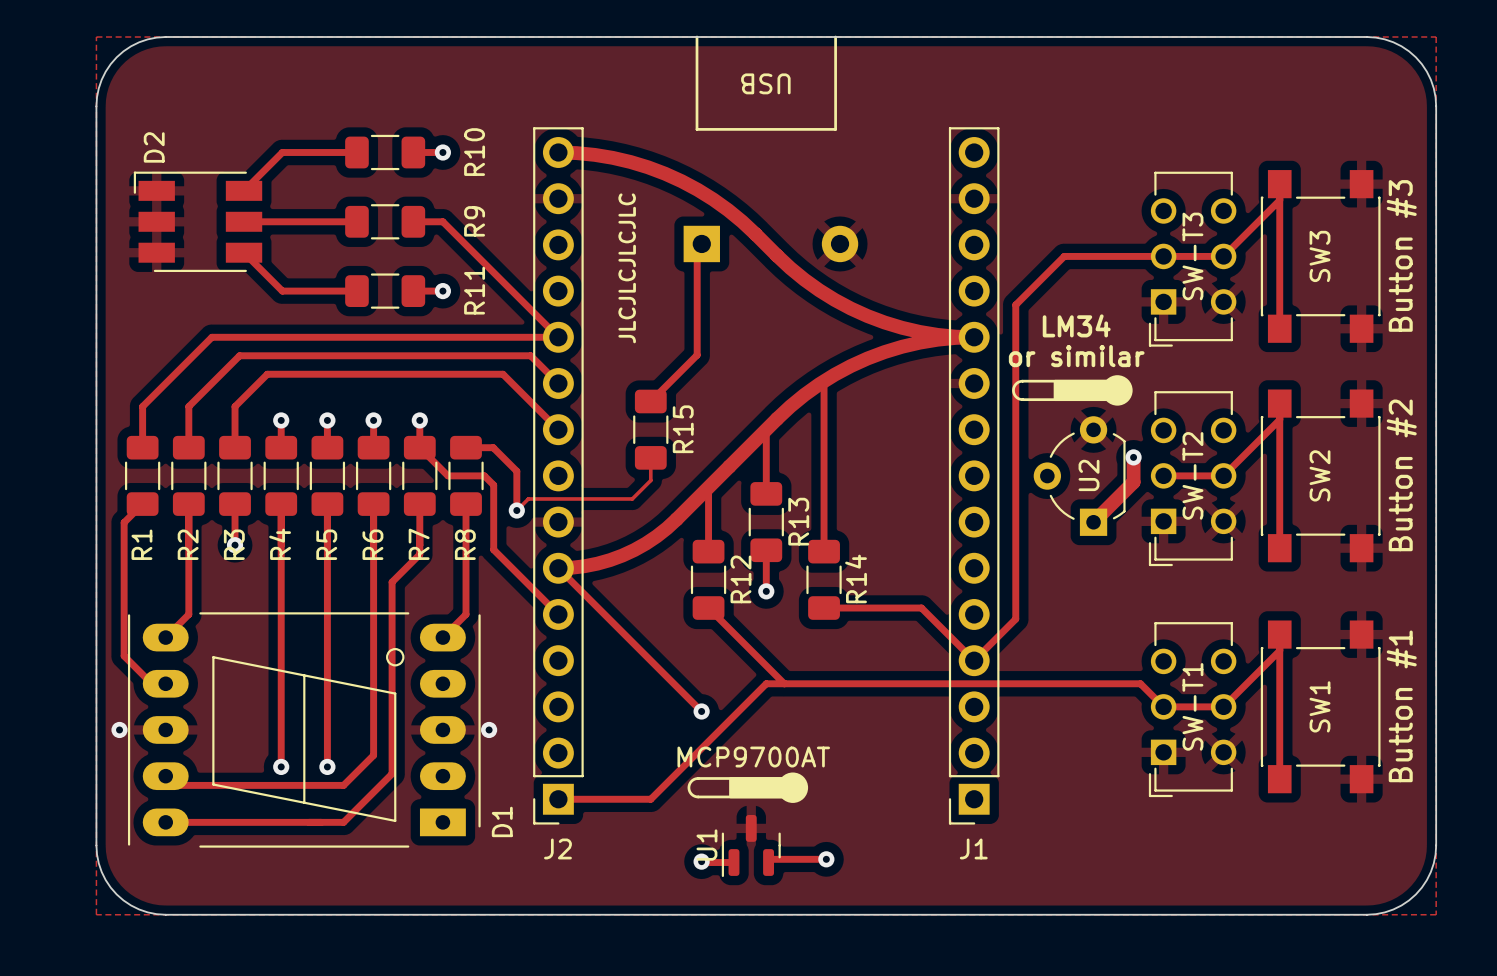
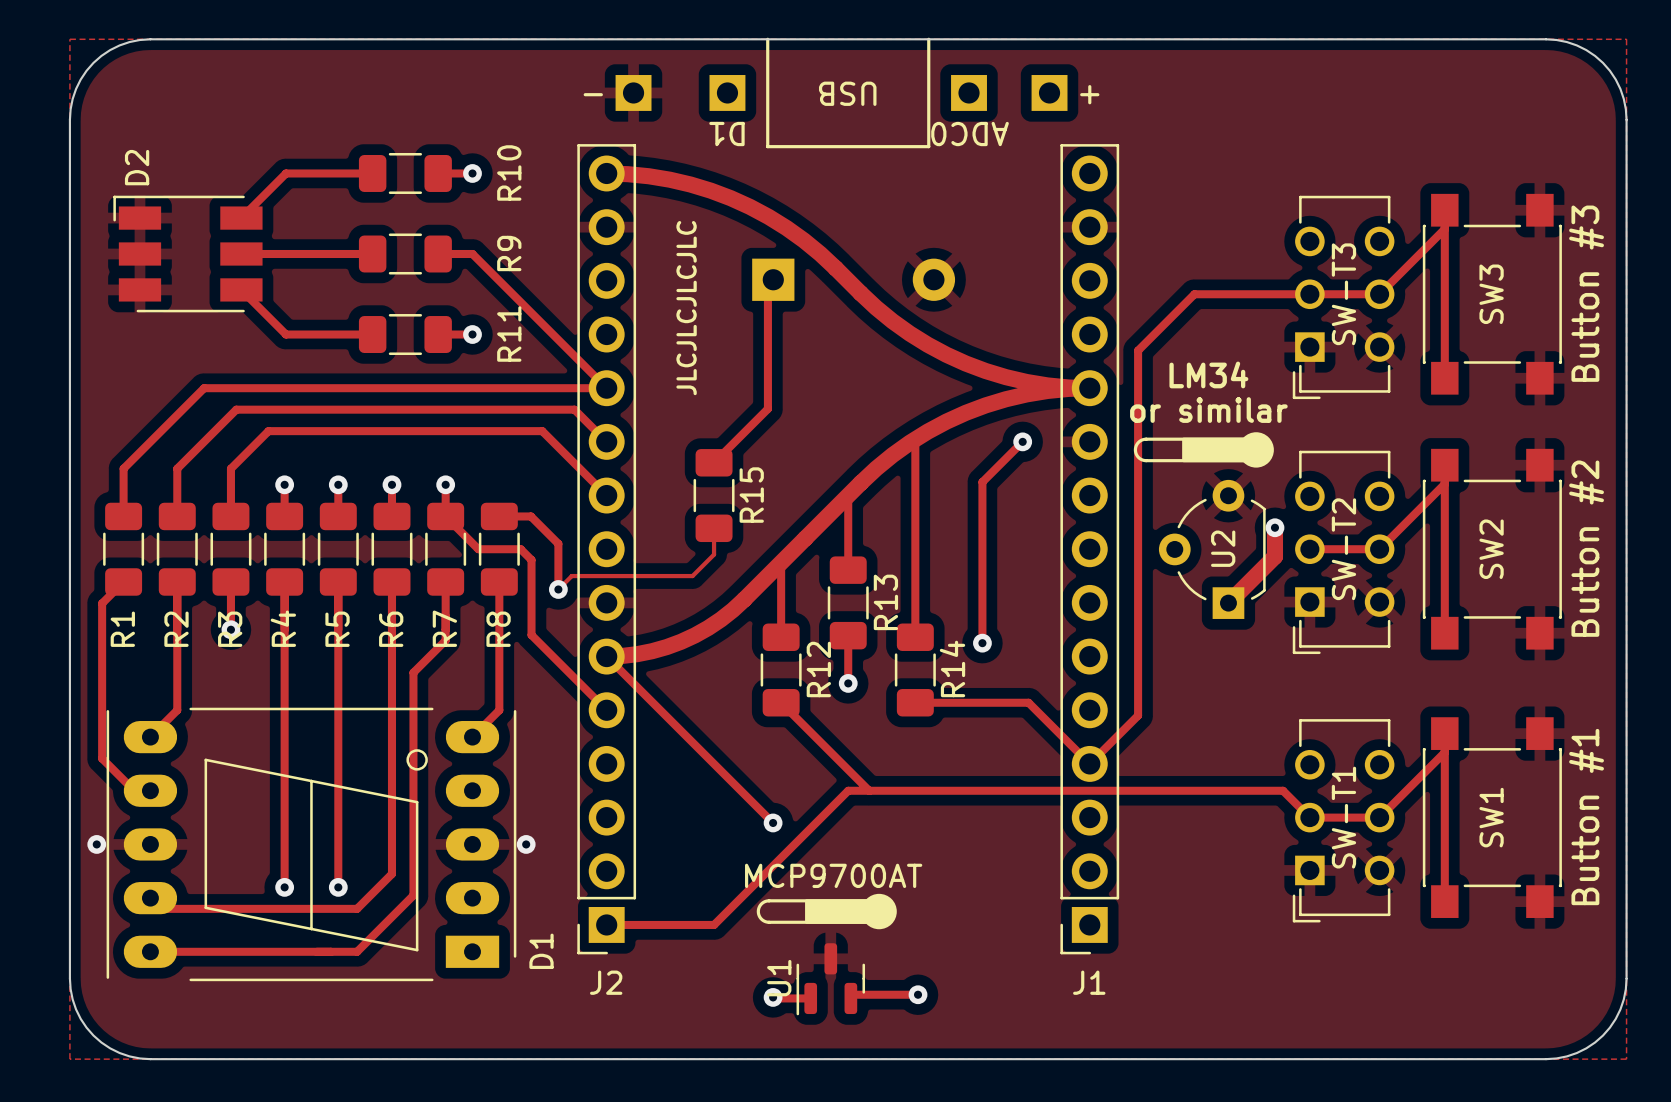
part: none -> (633, 92)
part: none -> (727, 92)
part: none -> (969, 92)
part: none -> (1049, 92)
text: none -> - (593, 94)
text: none -> + (1089, 94)
text: none -> D1 (726, 134)
text: none -> ADC0 (970, 134)
track: none -> (1022, 441) (982, 482) (982, 643)
via: none -> (1022, 441)
via: none -> (982, 643)

